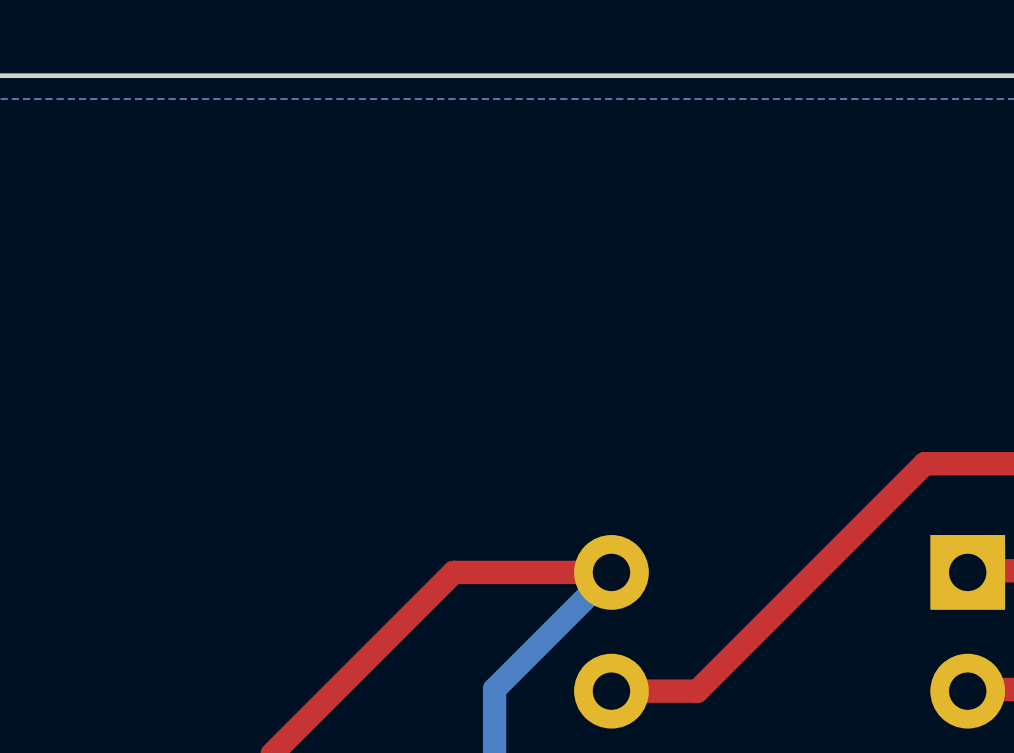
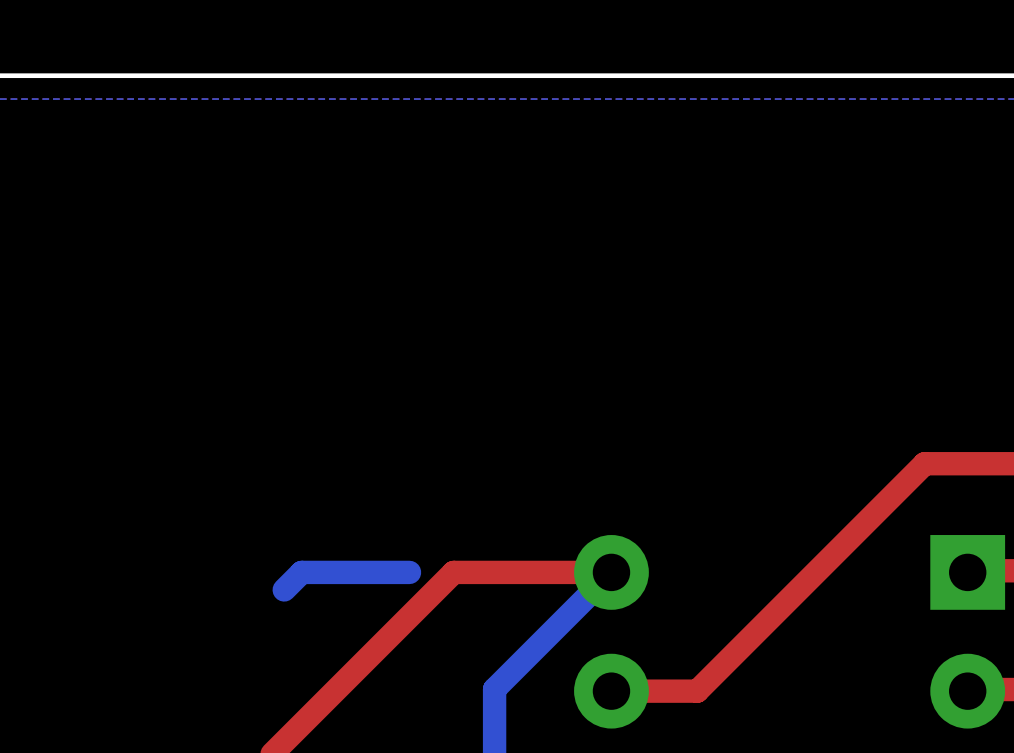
bottom track: none -> (409, 572) (301, 572) (284, 589)

